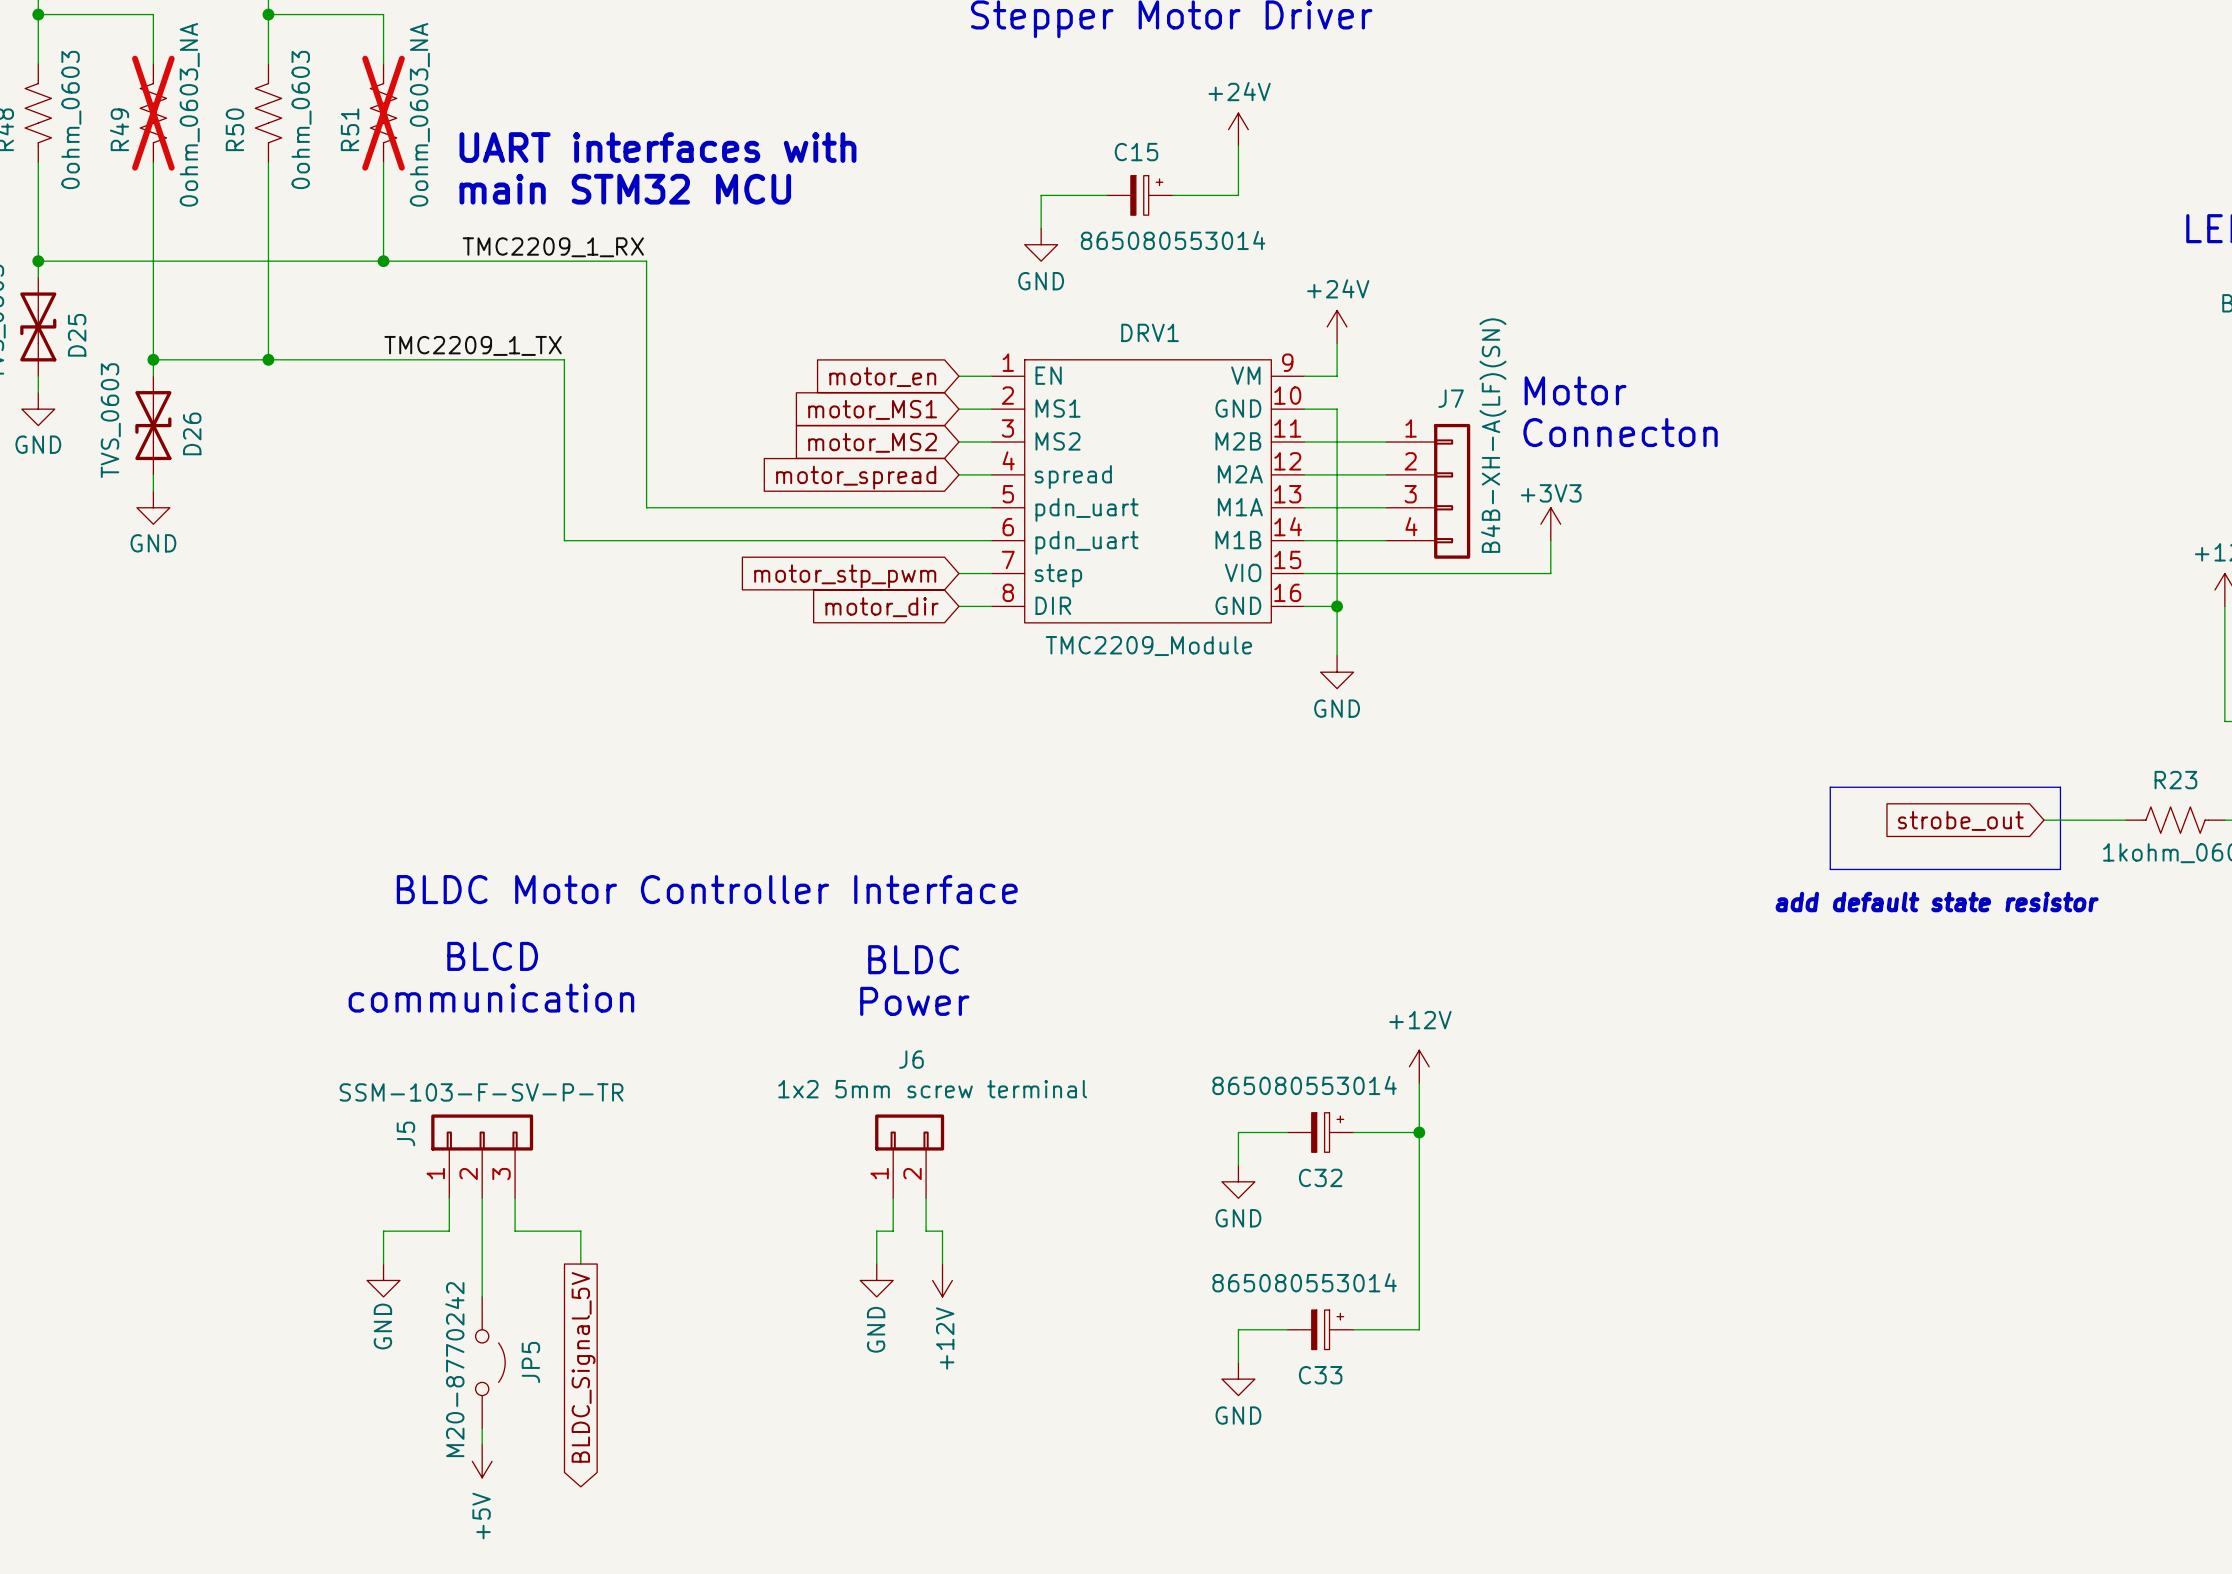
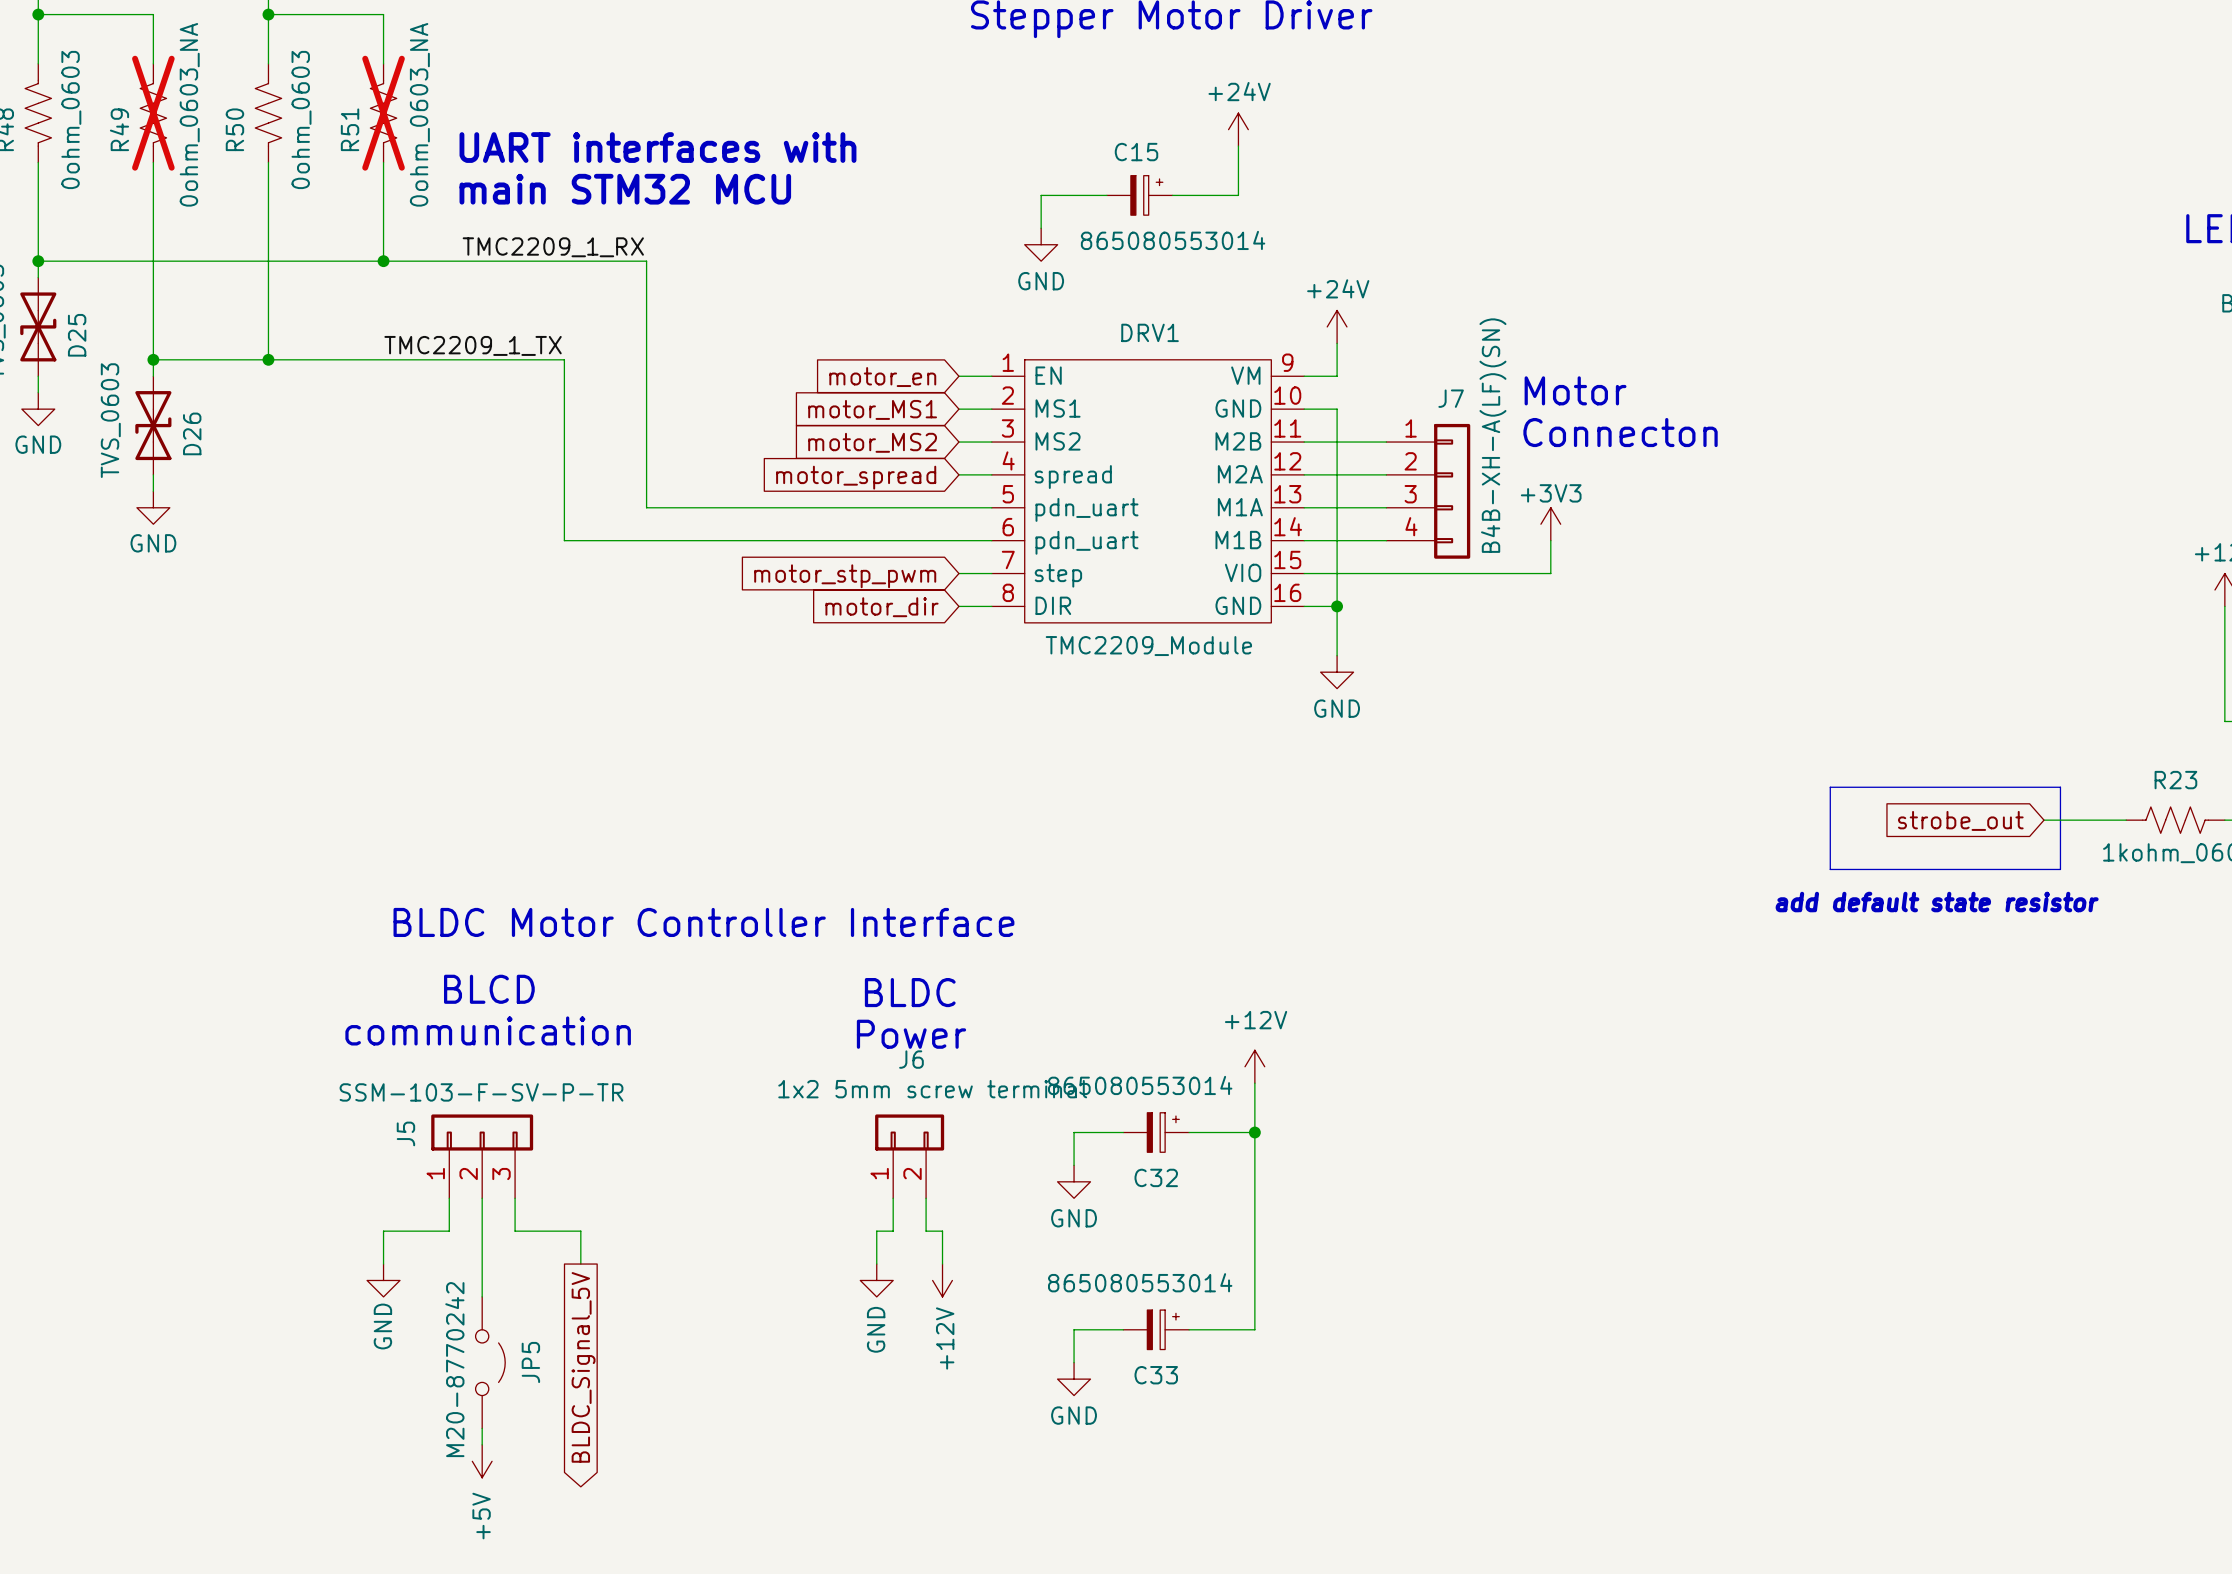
text position: BLDC Motor Controller Interface (707, 889) -> BLDC Motor Controller Interface (703, 922)
text position: BLCD (492, 956) -> BLCD (489, 989)
text position: BLDC (913, 959) -> BLDC (910, 992)
text position: communication (491, 998) -> communication (488, 1030)
text position: Power (914, 1001) -> Power (911, 1034)
power symbol position: +12V (1419, 1066) -> +12V (1254, 1066)
wire: (1419, 1083) (1419, 1329) (1353, 1329) -> none
wire: none -> (1123, 1132) (1074, 1132) (1074, 1165)
wire: (1238, 1132) (1238, 1165) -> (1238, 1132) (1189, 1132)
wire: (1254, 1132) (1287, 1132) -> none
junction: none -> (1254, 1132)
C32 position: (1320, 1132) -> (1156, 1132)
wire: (1353, 1132) (1419, 1132) -> none
junction: (1419, 1132) -> none
power symbol: none -> GND (1074, 1181)
power symbol: GND (1238, 1181) -> none
wire: none -> (1123, 1329) (1074, 1329) (1074, 1362)
wire: (1238, 1329) (1238, 1362) -> (1238, 1329) (1189, 1329)
wire: (1254, 1329) (1287, 1329) -> (1254, 1329) (1254, 1083)
C33 position: (1320, 1329) -> (1156, 1329)
power symbol: none -> GND (1074, 1379)
power symbol: GND (1238, 1379) -> none

